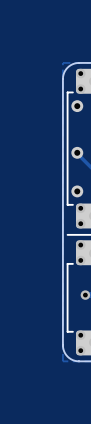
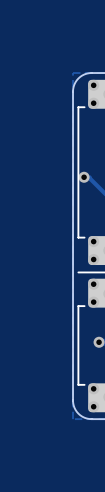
part: (77, 106) -> none
via: none -> (84, 177)
part: (77, 152) -> none
part: (77, 191) -> none

